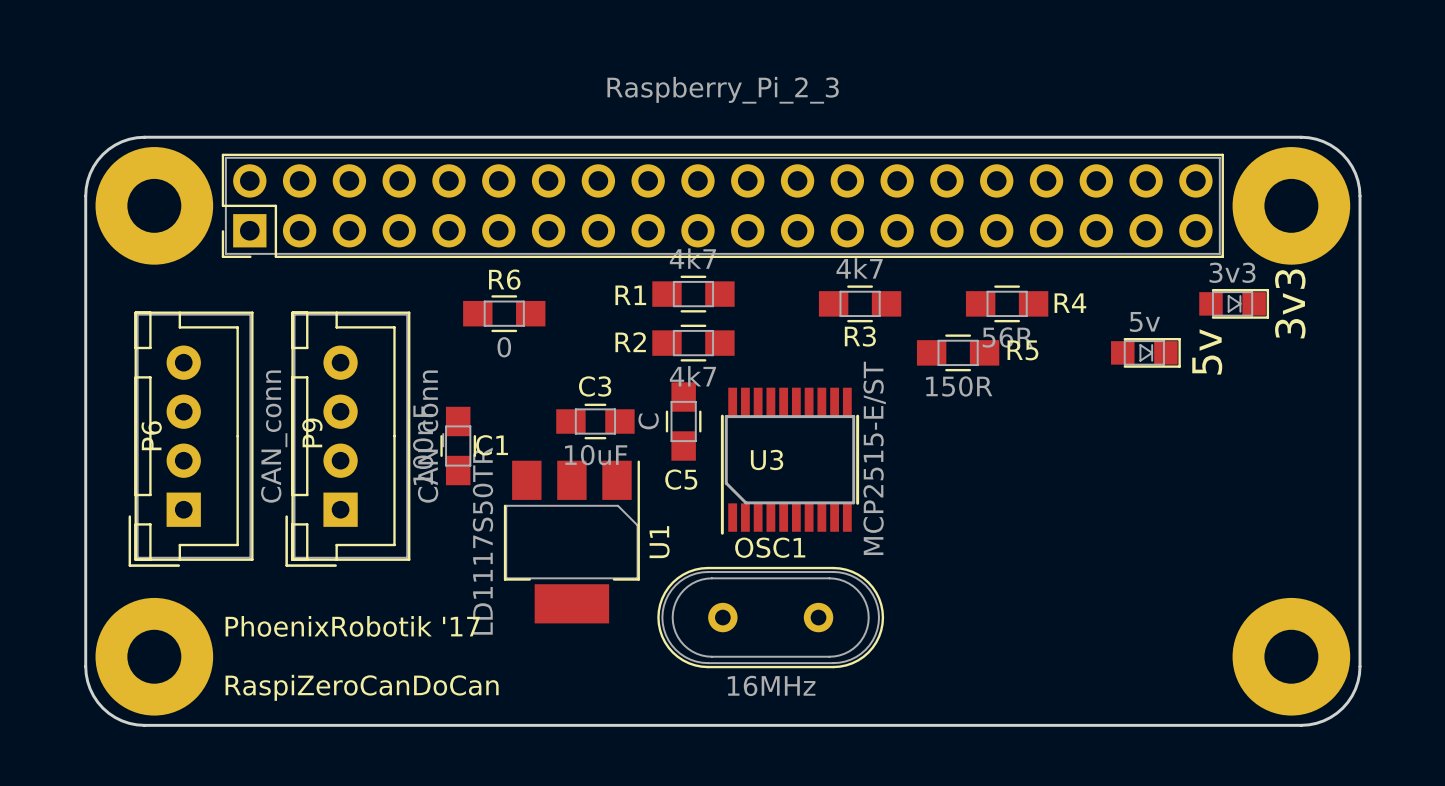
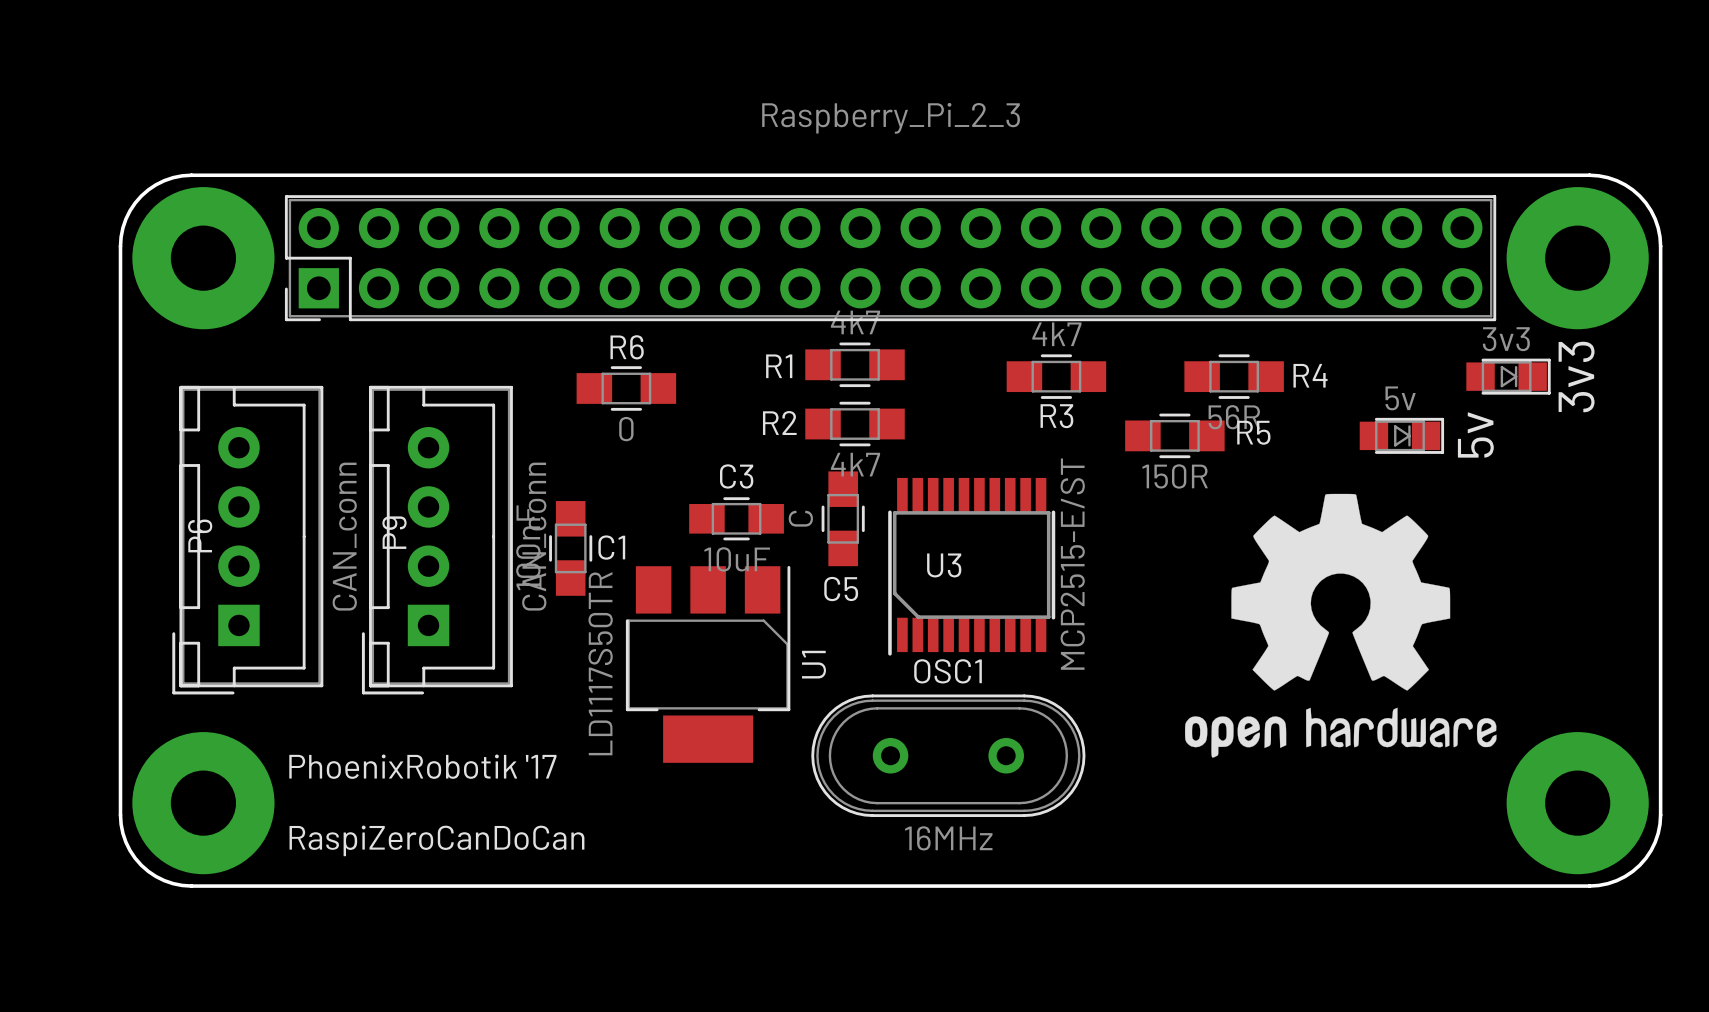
drawing: none -> [1184, 493, 1497, 758]

